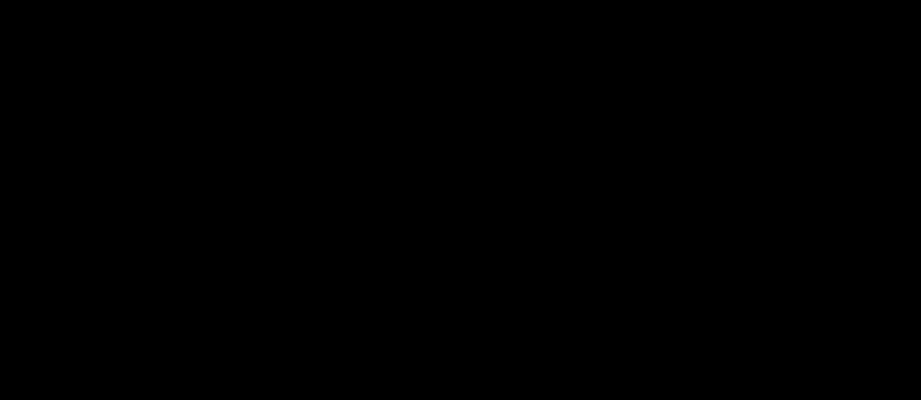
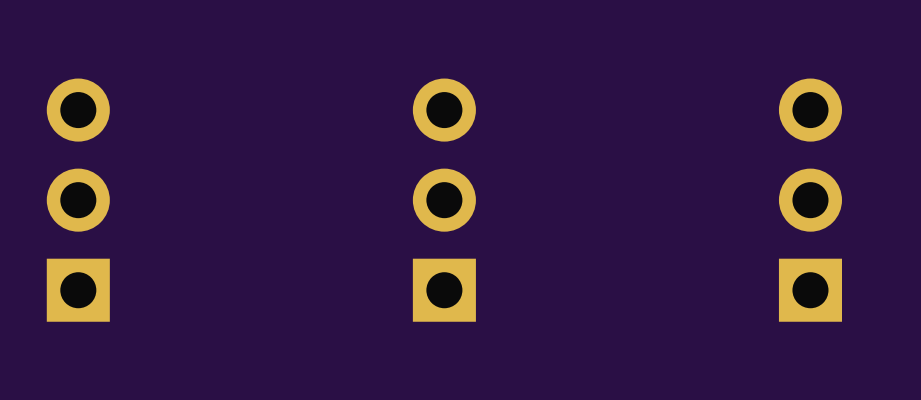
part: none -> (78, 200)
part: none -> (444, 200)
part: none -> (810, 200)

